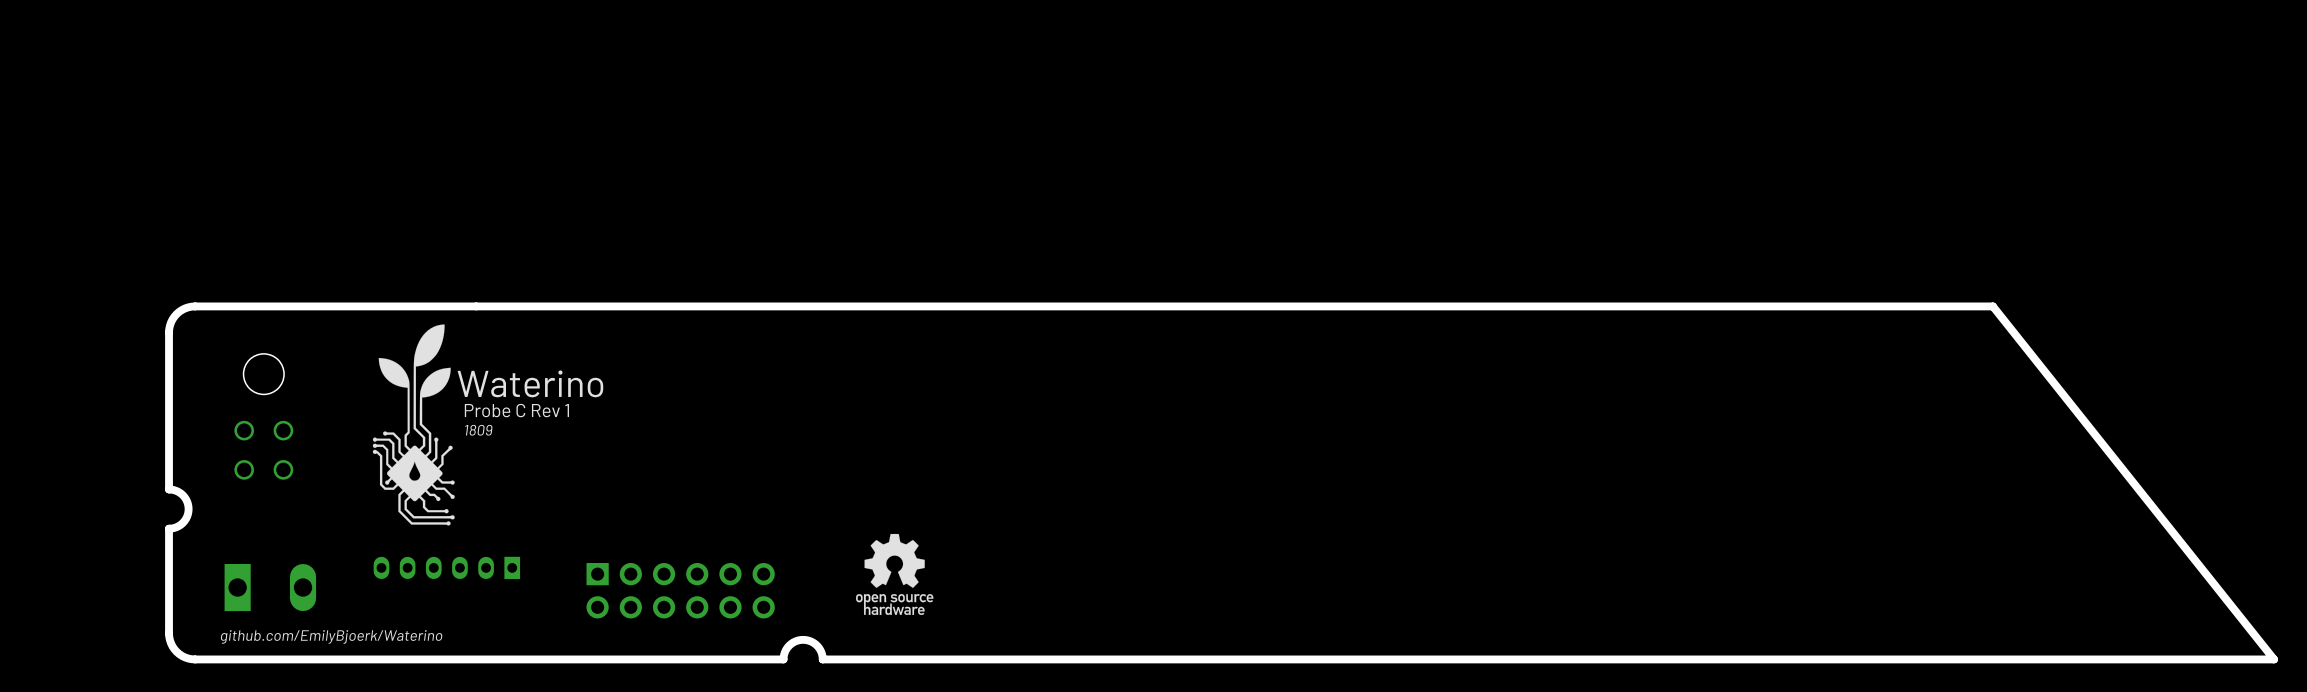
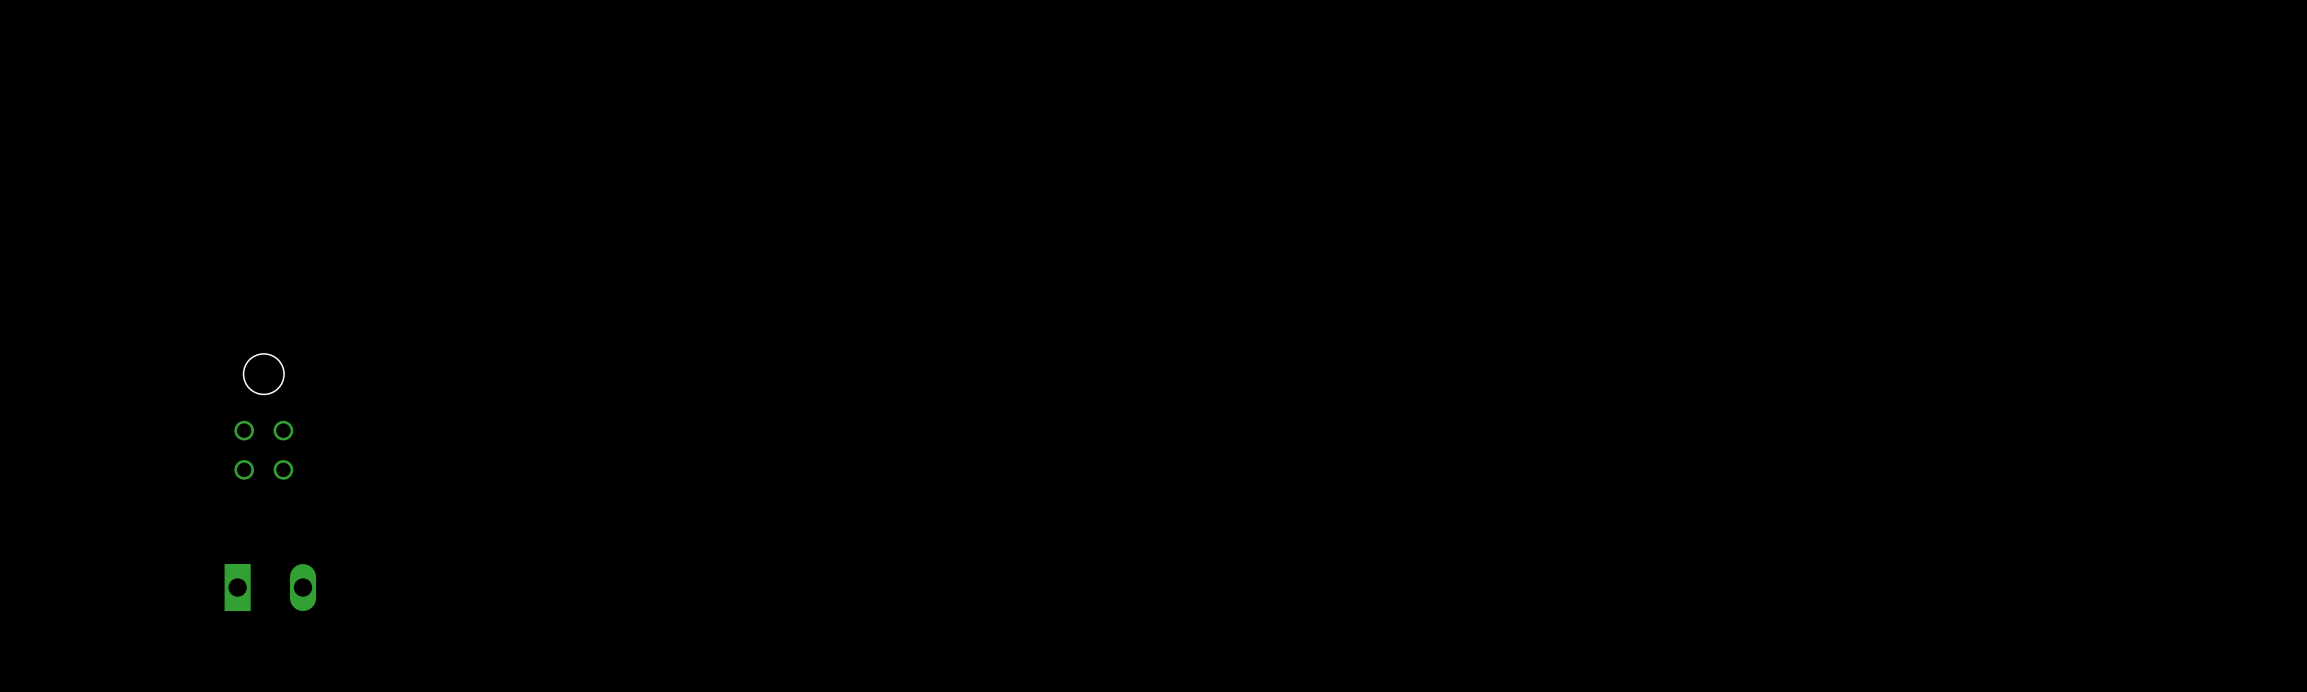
board edge: (1992, 306) (191, 306) (176, 314) (169, 329) (169, 489) (182, 495) (188, 509) (182, 522) (169, 528) (169, 636) (176, 651) (185, 657) (195, 659) (783, 659) (789, 645) (803, 639) (817, 645) (822, 659) (2274, 659) (1992, 306) -> none
drawing: [372, 324, 455, 526] -> none
text: Waterino (530, 383) -> none
text: Probe C Rev 1 (516, 410) -> none
text: 1809 (478, 430) -> none
drawing: [856, 533, 934, 616] -> none
part: (446, 567) -> none
part: (680, 590) -> none
text: github.com/EmilyBjoerk/Waterino (331, 637) -> none

